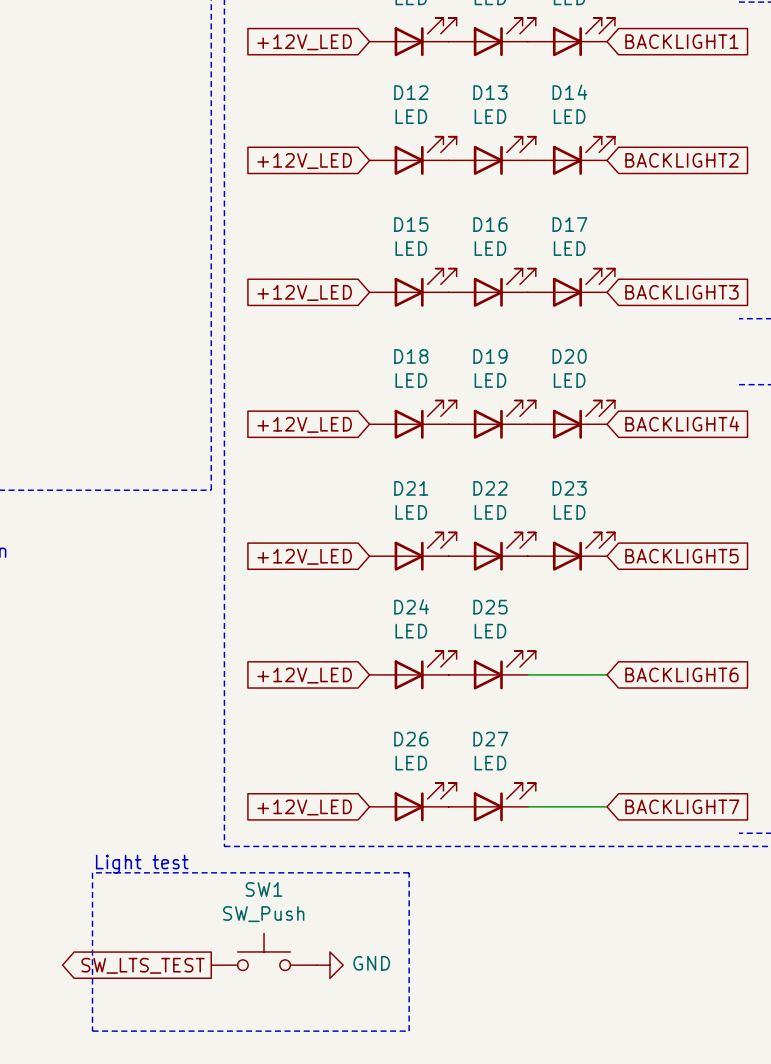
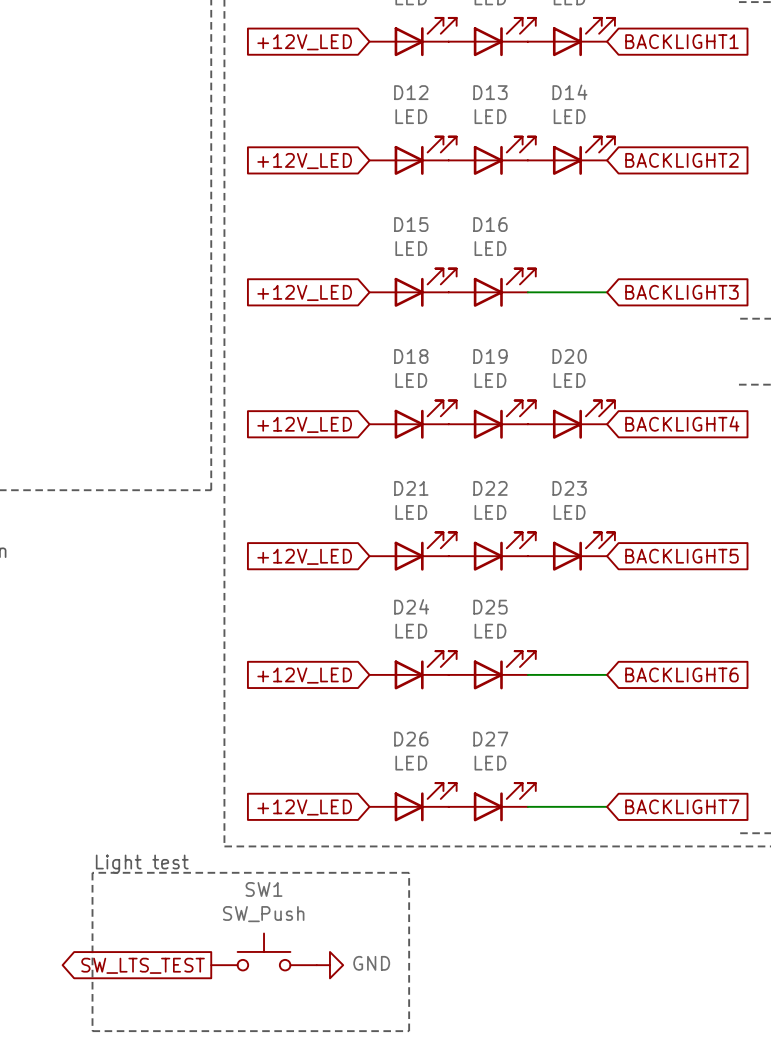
D17: LED (571, 287) -> none

